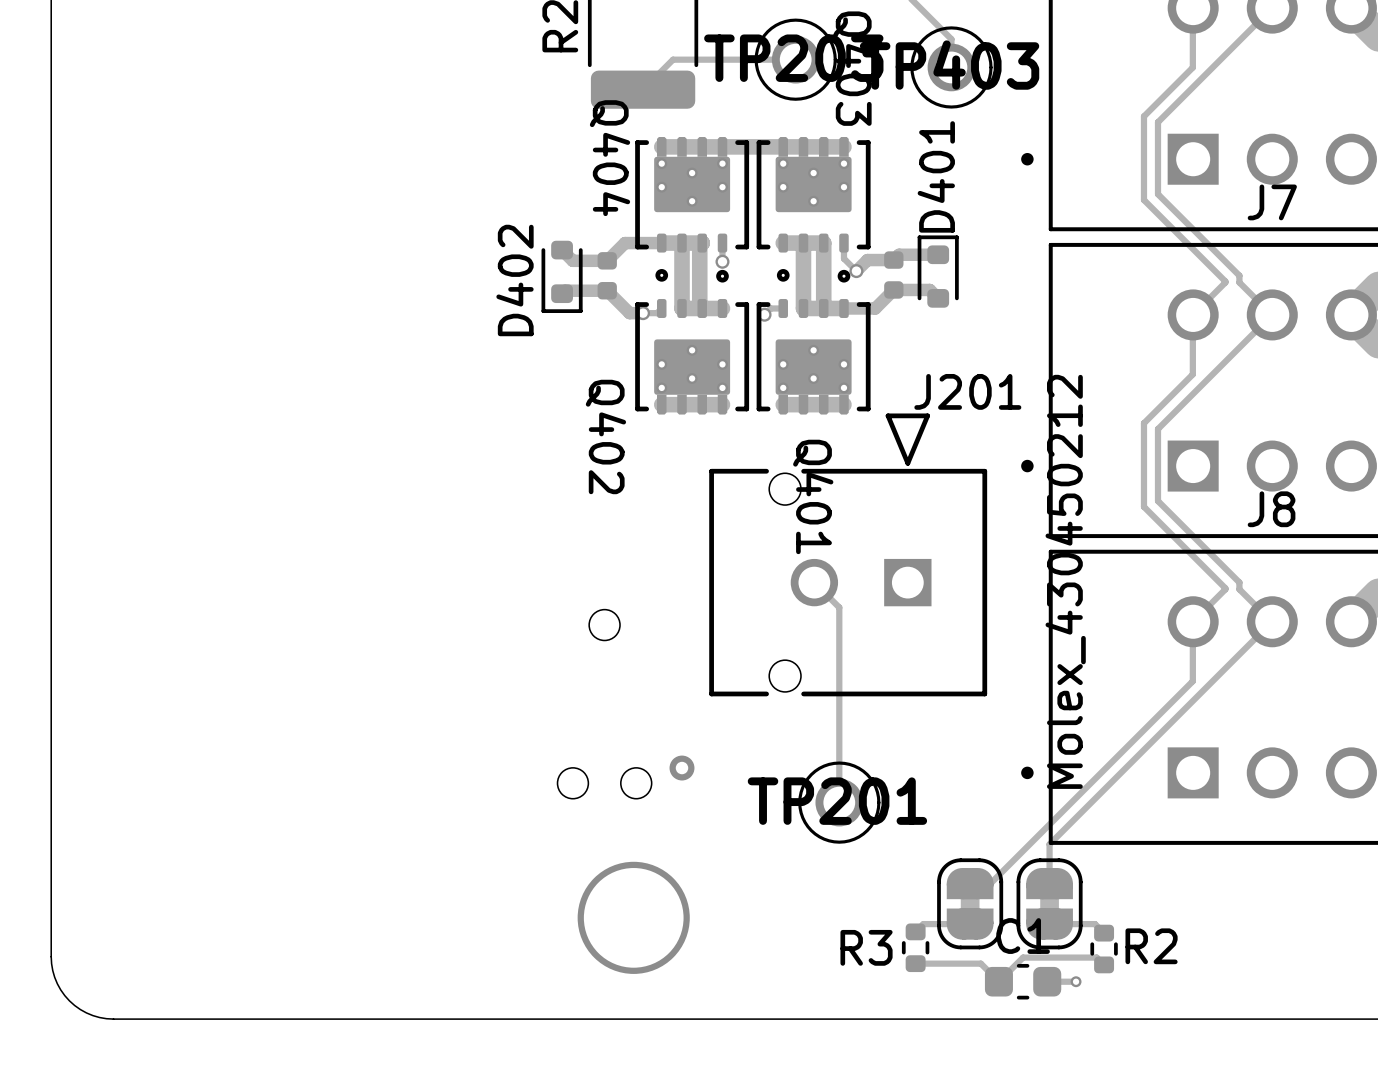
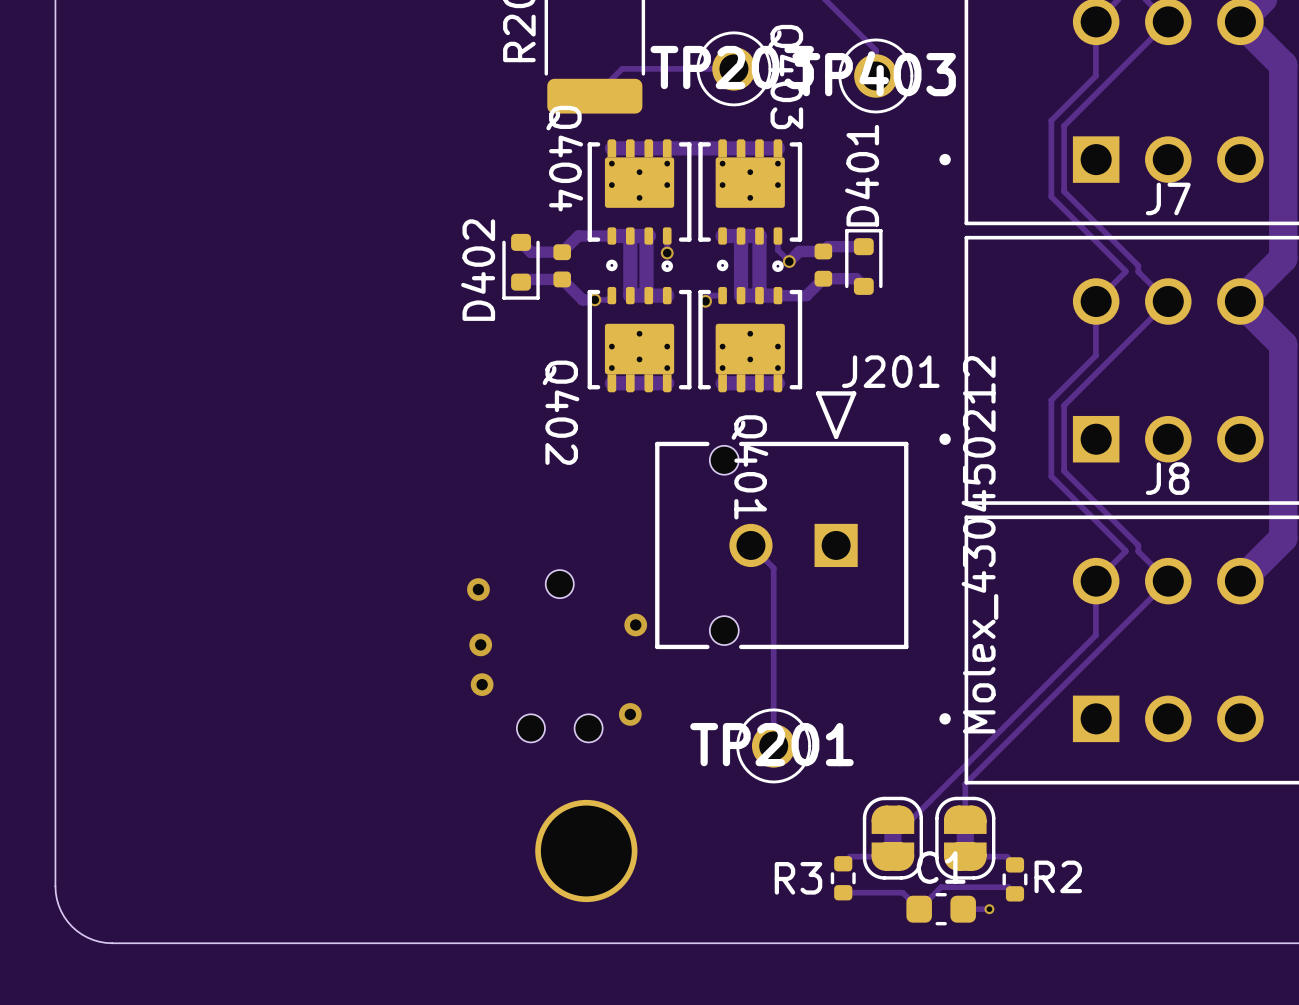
via: none -> (478, 589)
via: none -> (635, 625)
via: none -> (480, 644)
via: none -> (482, 684)

